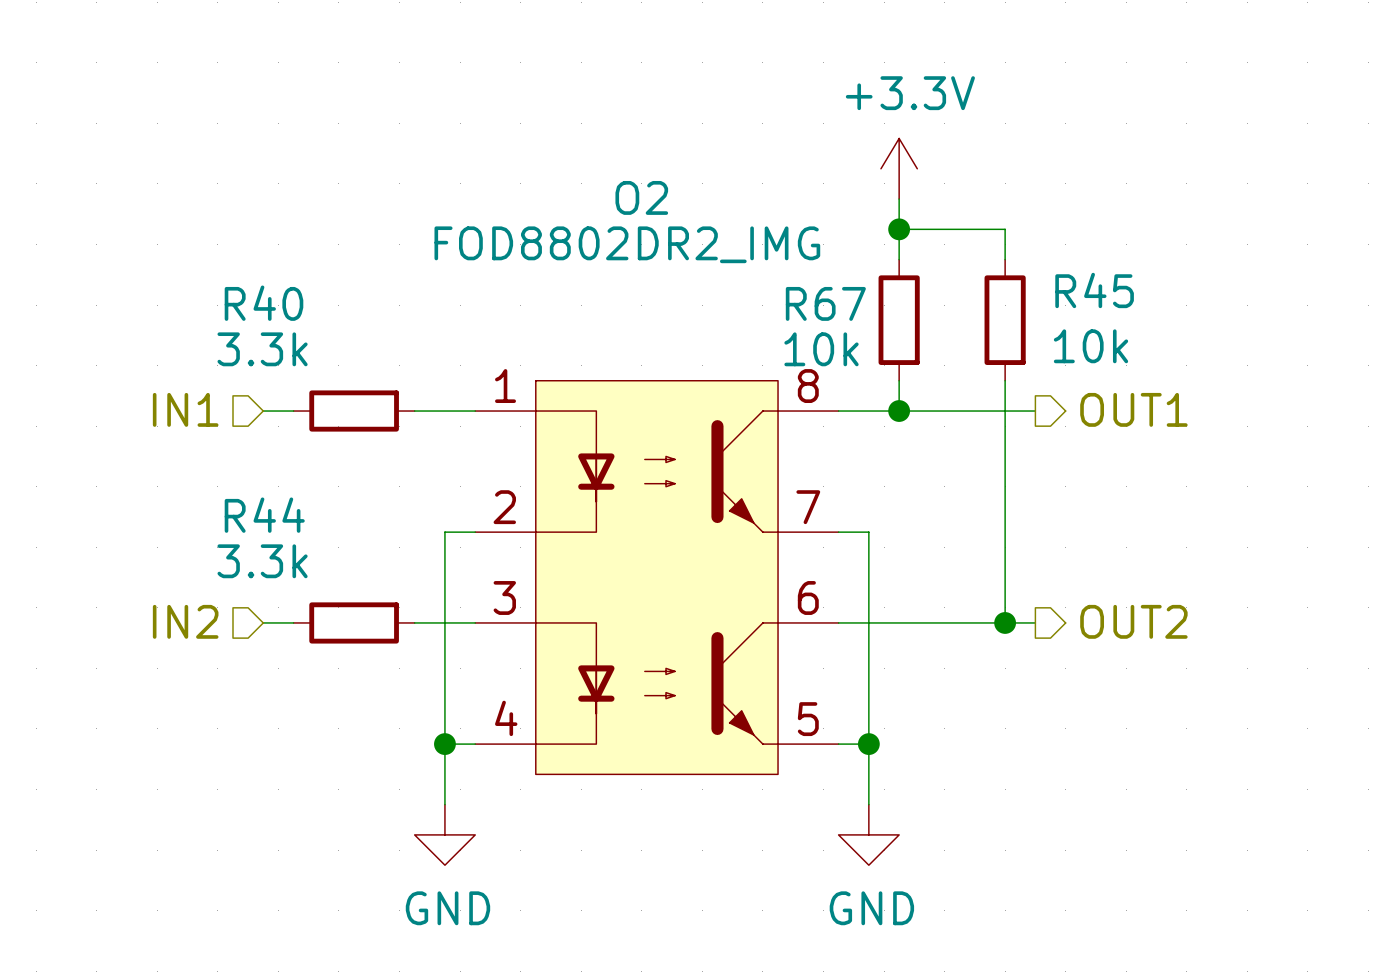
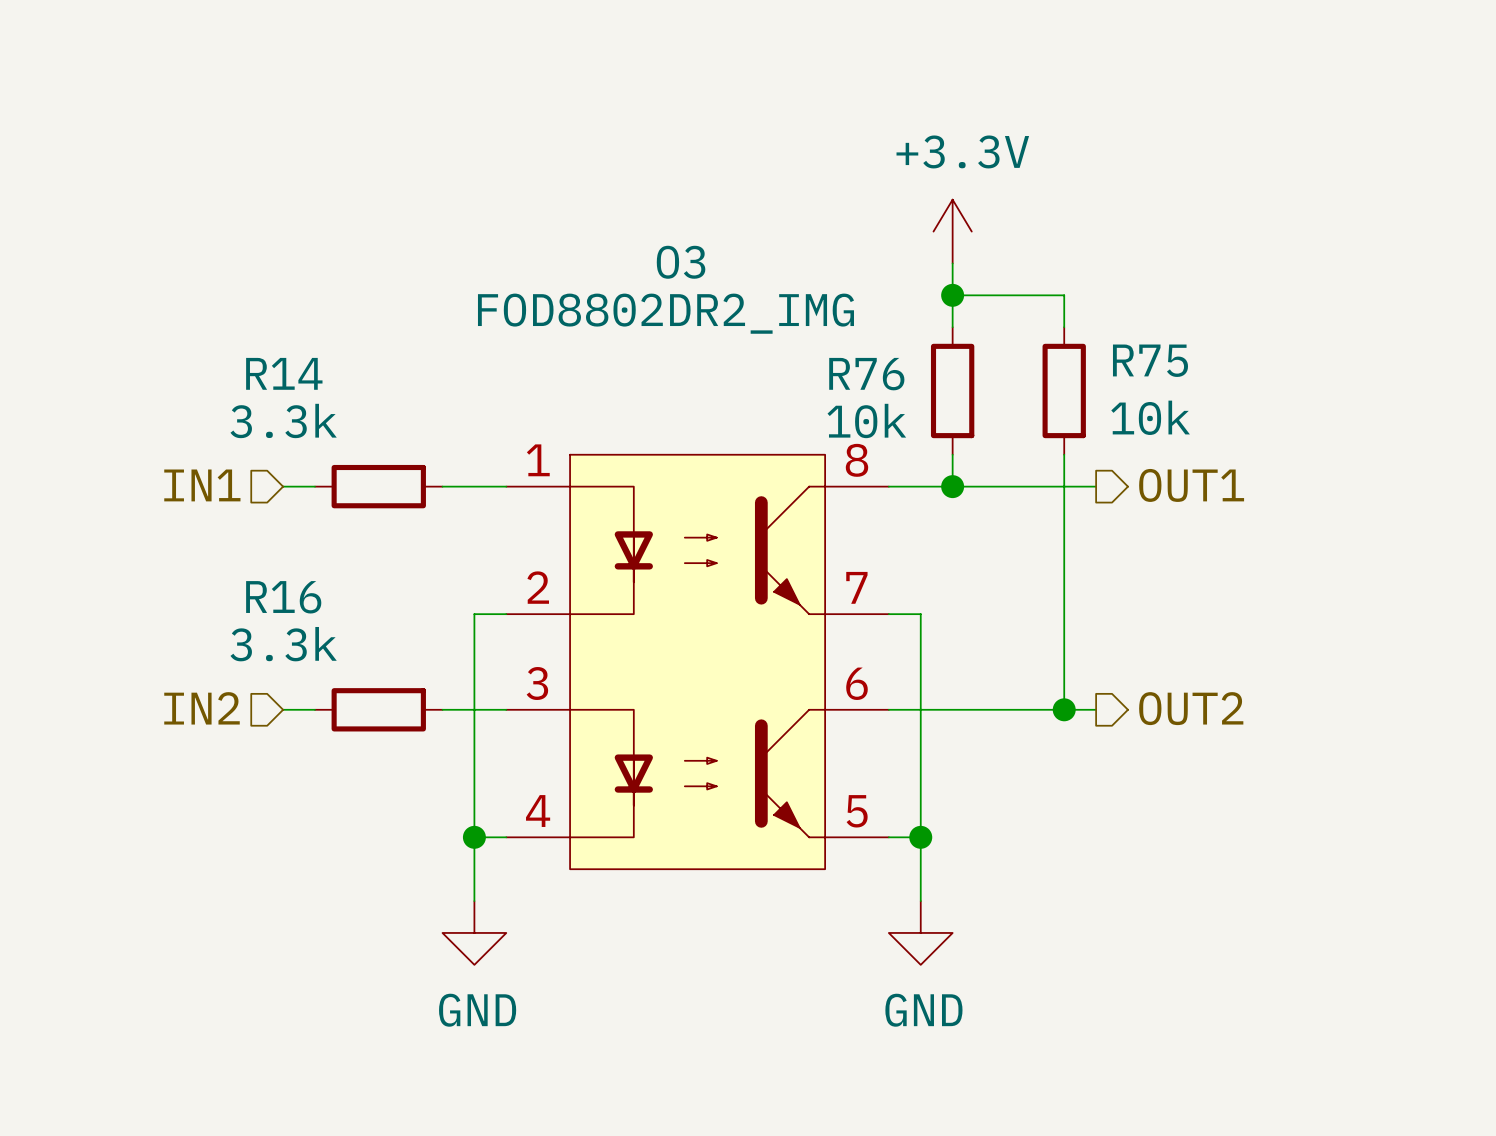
O2 name: O2 (641, 197) -> O3 (681, 262)
R45 name: R45 (1094, 290) -> R75 (1150, 360)
R40 name: R40 (264, 303) -> R14 (284, 373)
R67 name: R67 (825, 303) -> R76 (866, 374)
R44 name: R44 (264, 515) -> R16 (283, 597)

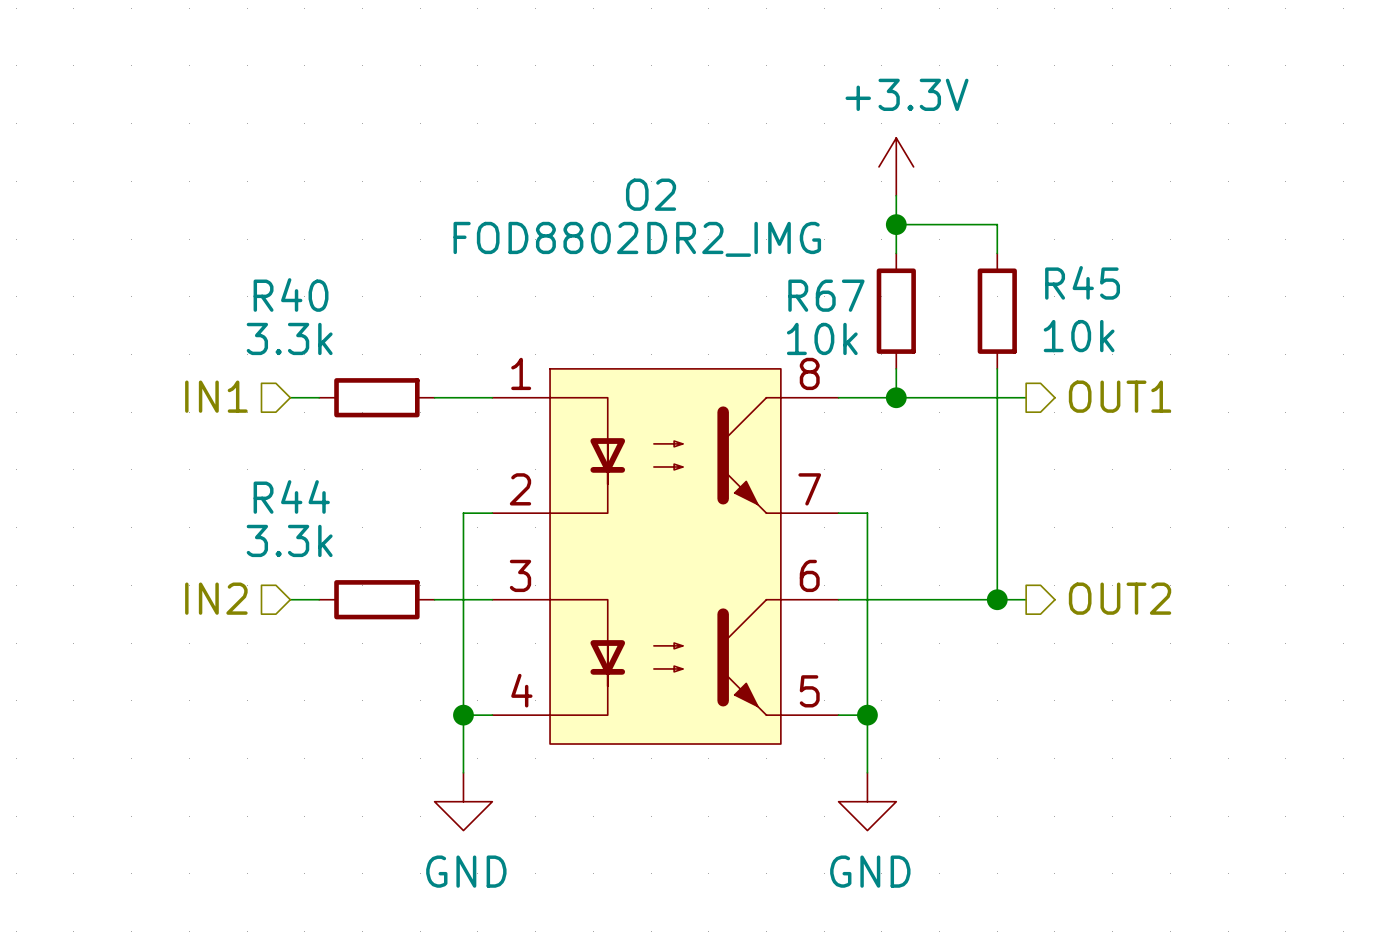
O3 name: O3 (681, 262) -> O2 (651, 194)
R75 name: R75 (1150, 360) -> R45 (1082, 282)
R14 name: R14 (284, 373) -> R40 (291, 294)
R76 name: R76 (866, 374) -> R67 (826, 295)
R16 name: R16 (283, 597) -> R44 (291, 496)

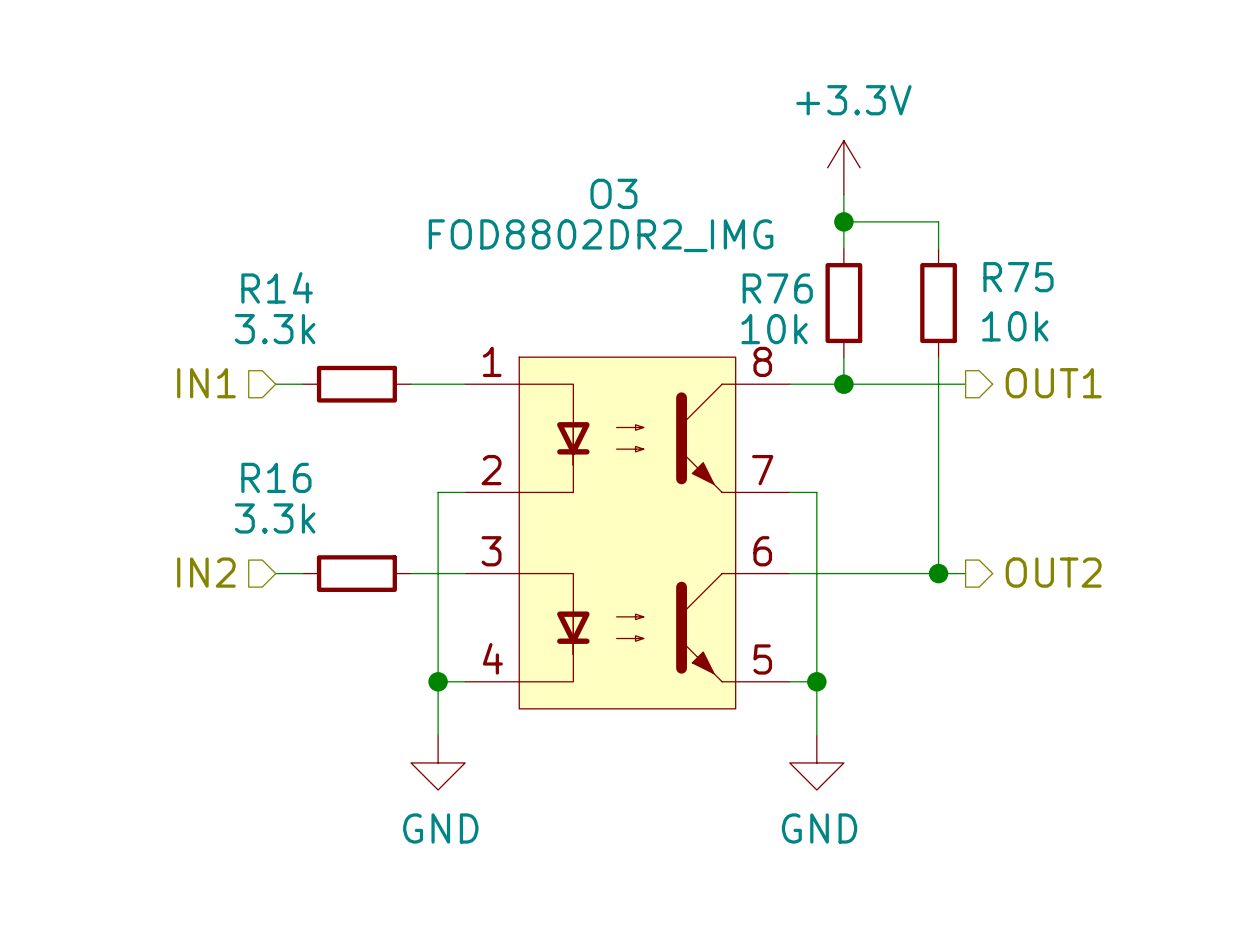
O2 name: O2 (651, 194) -> O3 (613, 193)
R45 name: R45 (1082, 282) -> R75 (1018, 277)
R40 name: R40 (291, 294) -> R14 (277, 287)
R67 name: R67 (826, 295) -> R76 (777, 288)
R44 name: R44 (291, 496) -> R16 (276, 477)

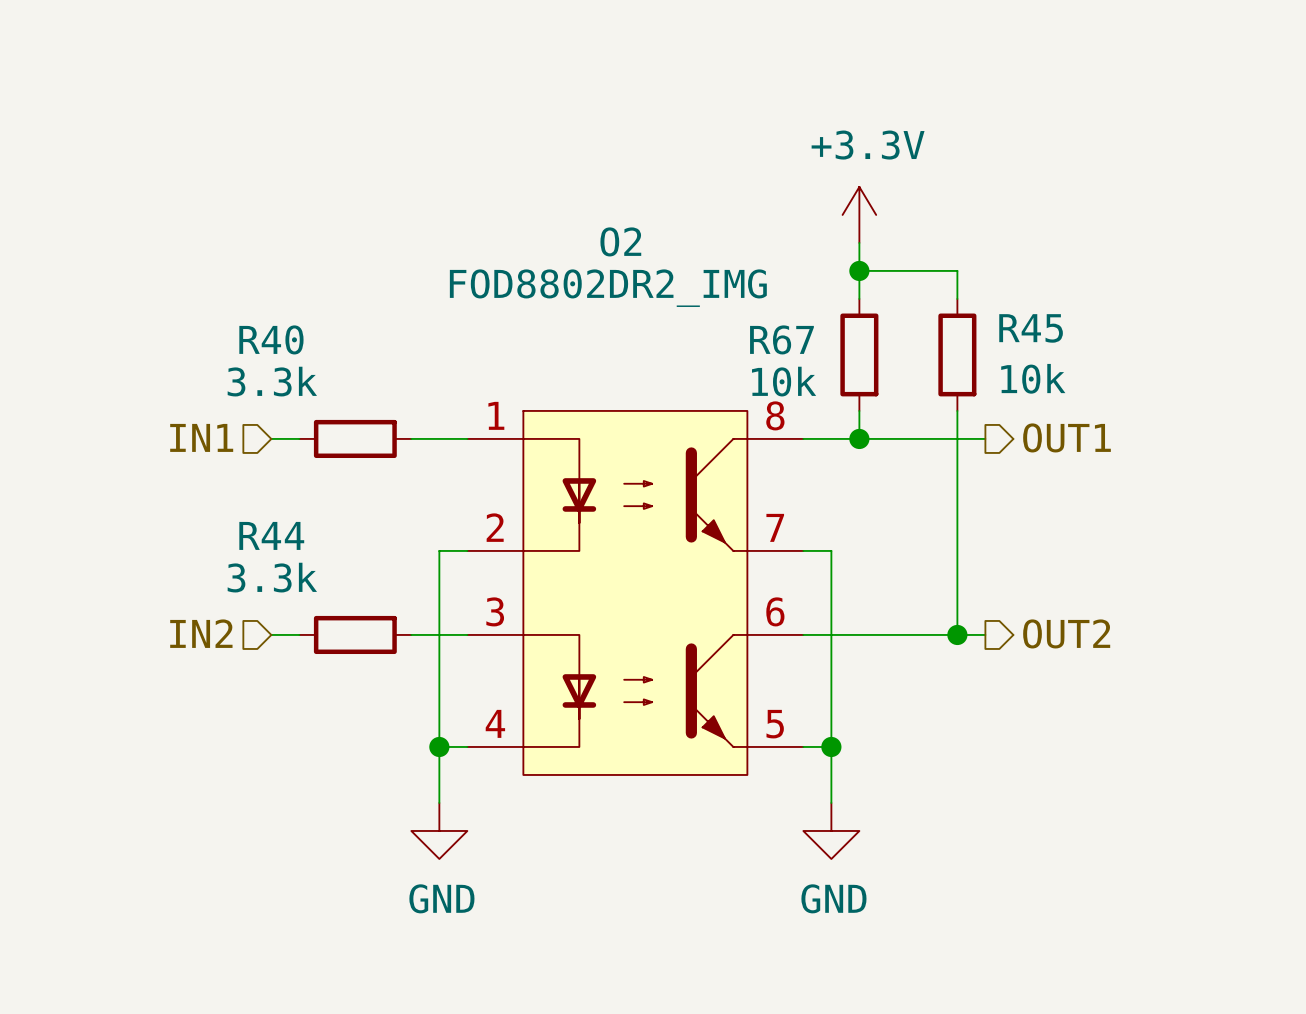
O3 name: O3 (613, 193) -> O2 (620, 241)
R75 name: R75 (1018, 277) -> R45 (1031, 328)
R14 name: R14 (277, 287) -> R40 (271, 339)
R76 name: R76 (777, 288) -> R67 (781, 339)
R16 name: R16 (276, 477) -> R44 (271, 535)

